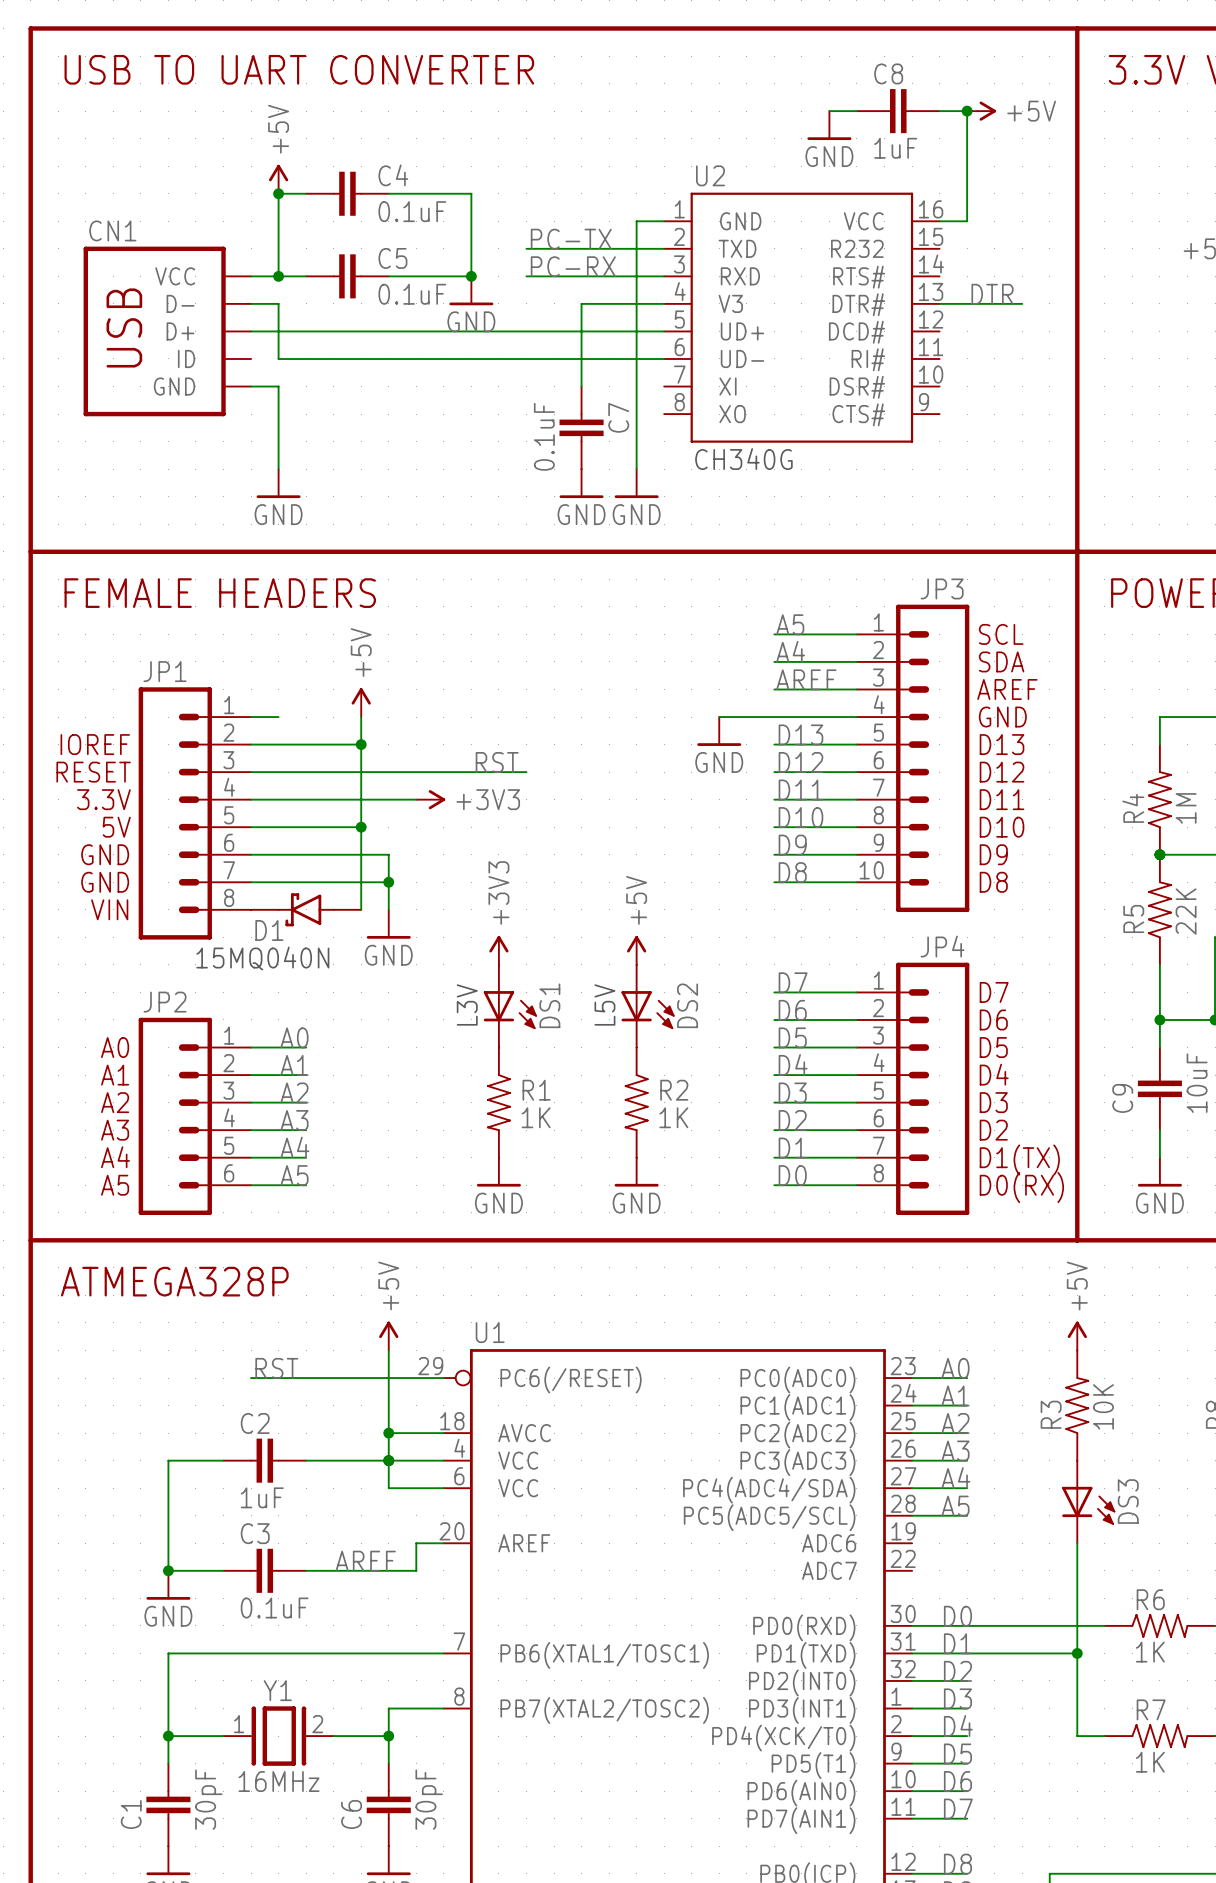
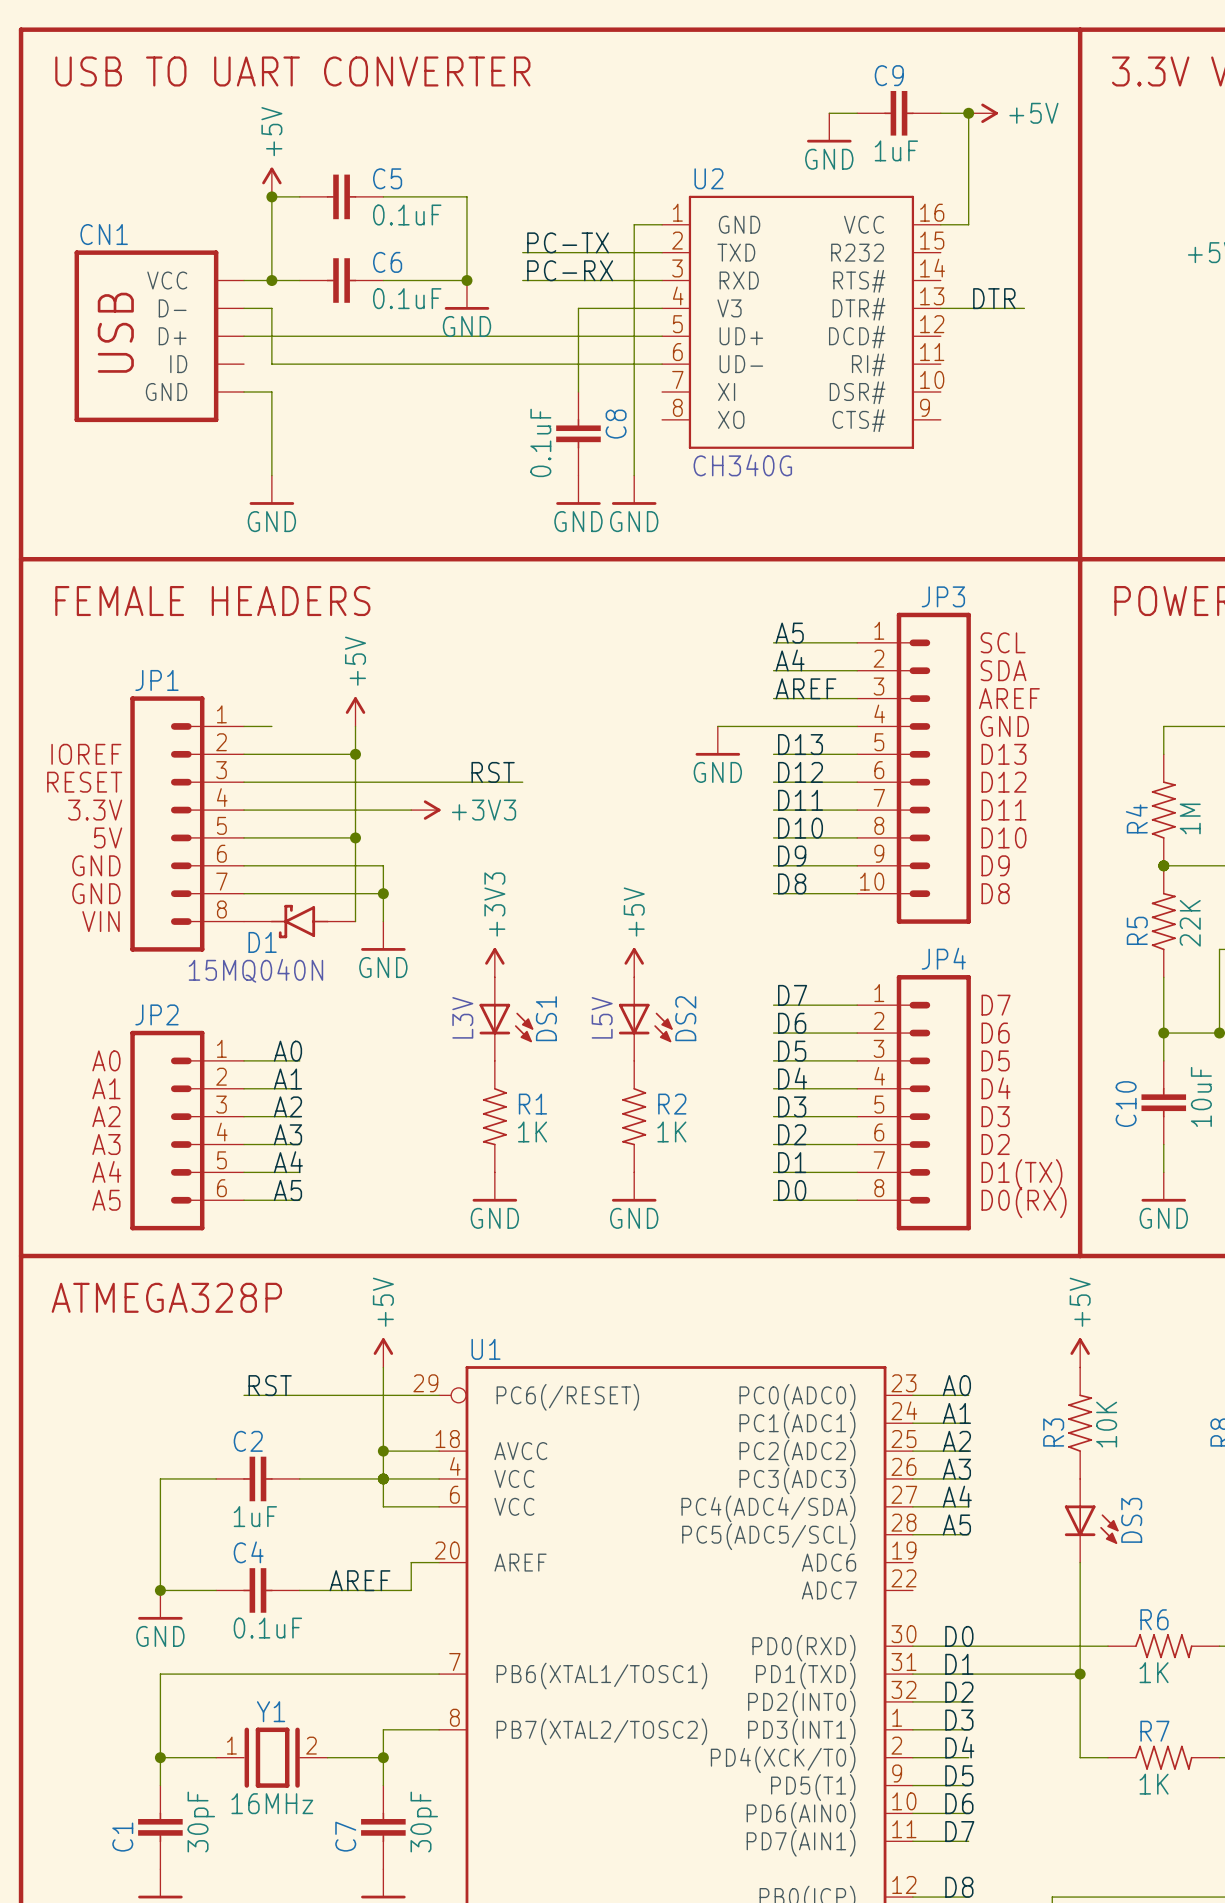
C8 name: C8 (888, 73) -> C9 (889, 75)
C4 name: C4 (393, 175) -> C5 (387, 178)
C5 name: C5 (392, 258) -> C6 (387, 262)
C7 name: C7 (618, 417) -> C8 (616, 424)
C9 name: C9 (1122, 1098) -> C10 (1126, 1104)
C3 name: C3 (255, 1533) -> C4 (248, 1552)
C6 name: C6 (351, 1814) -> C7 (345, 1836)

